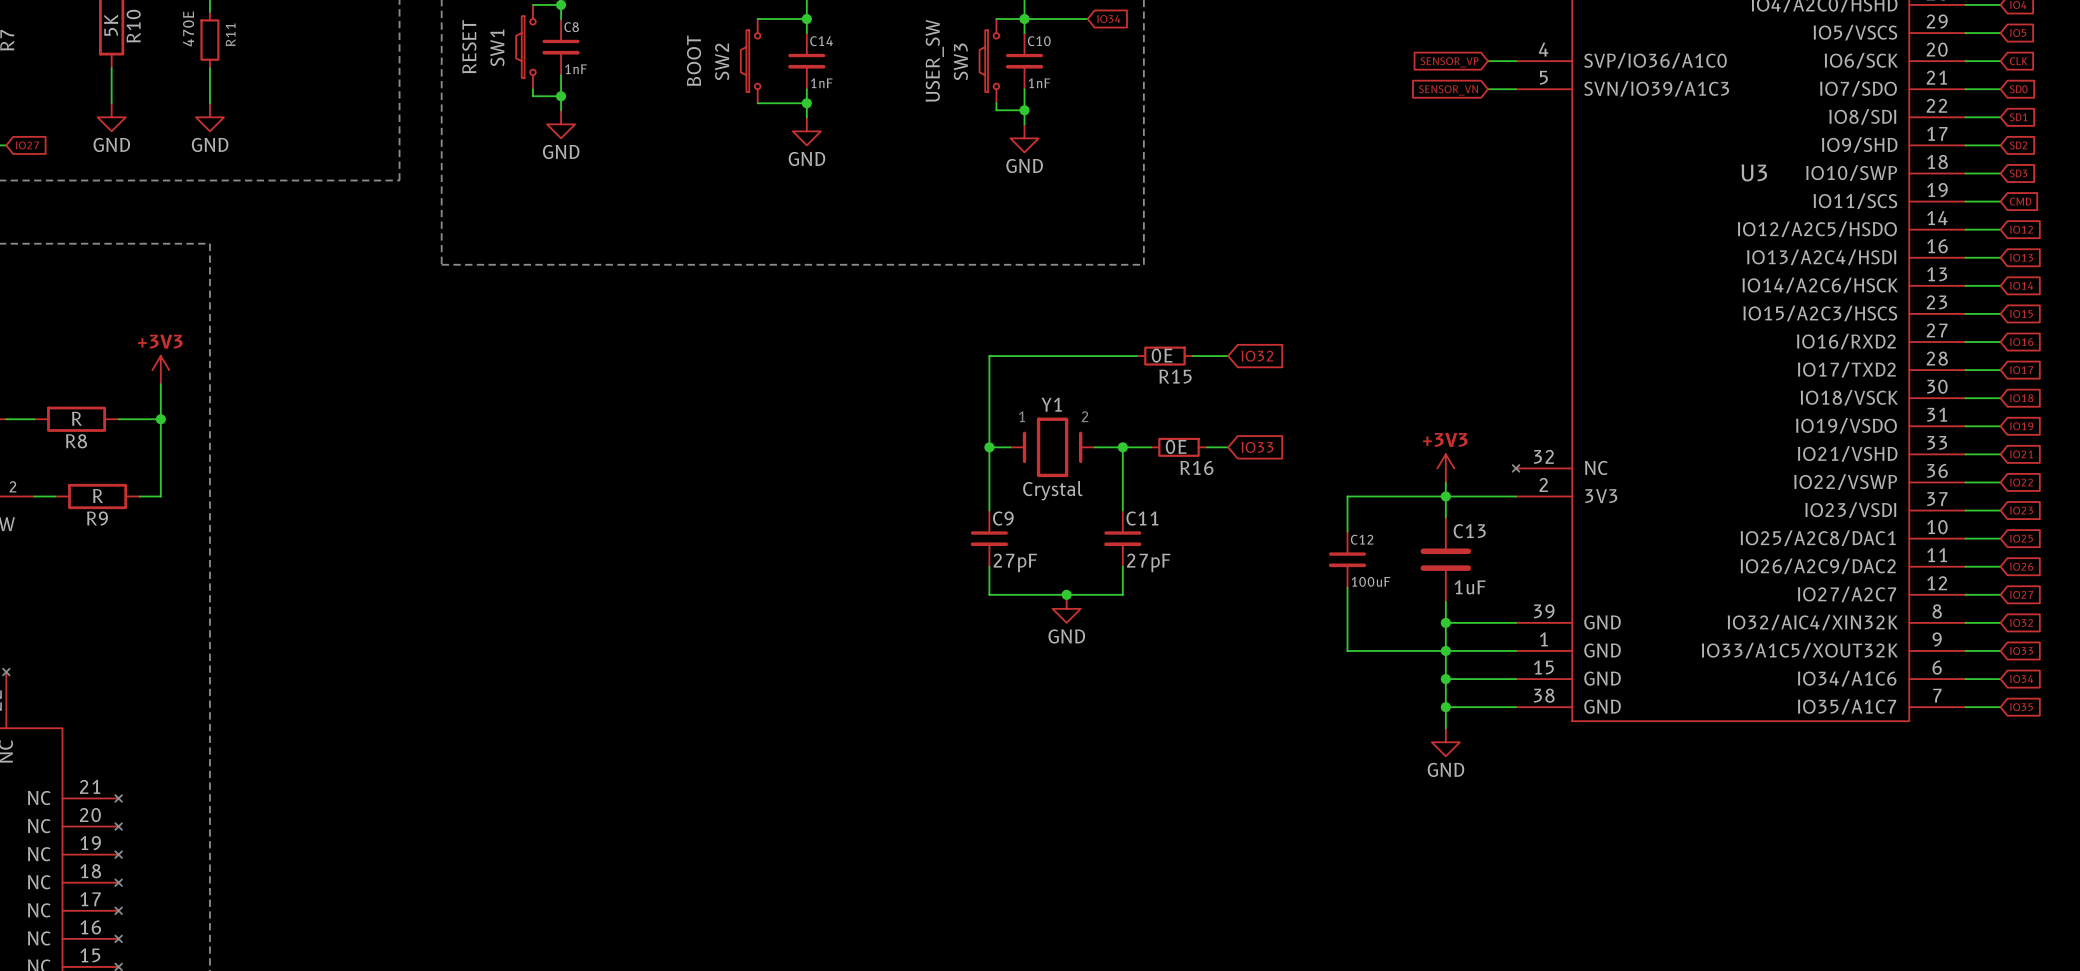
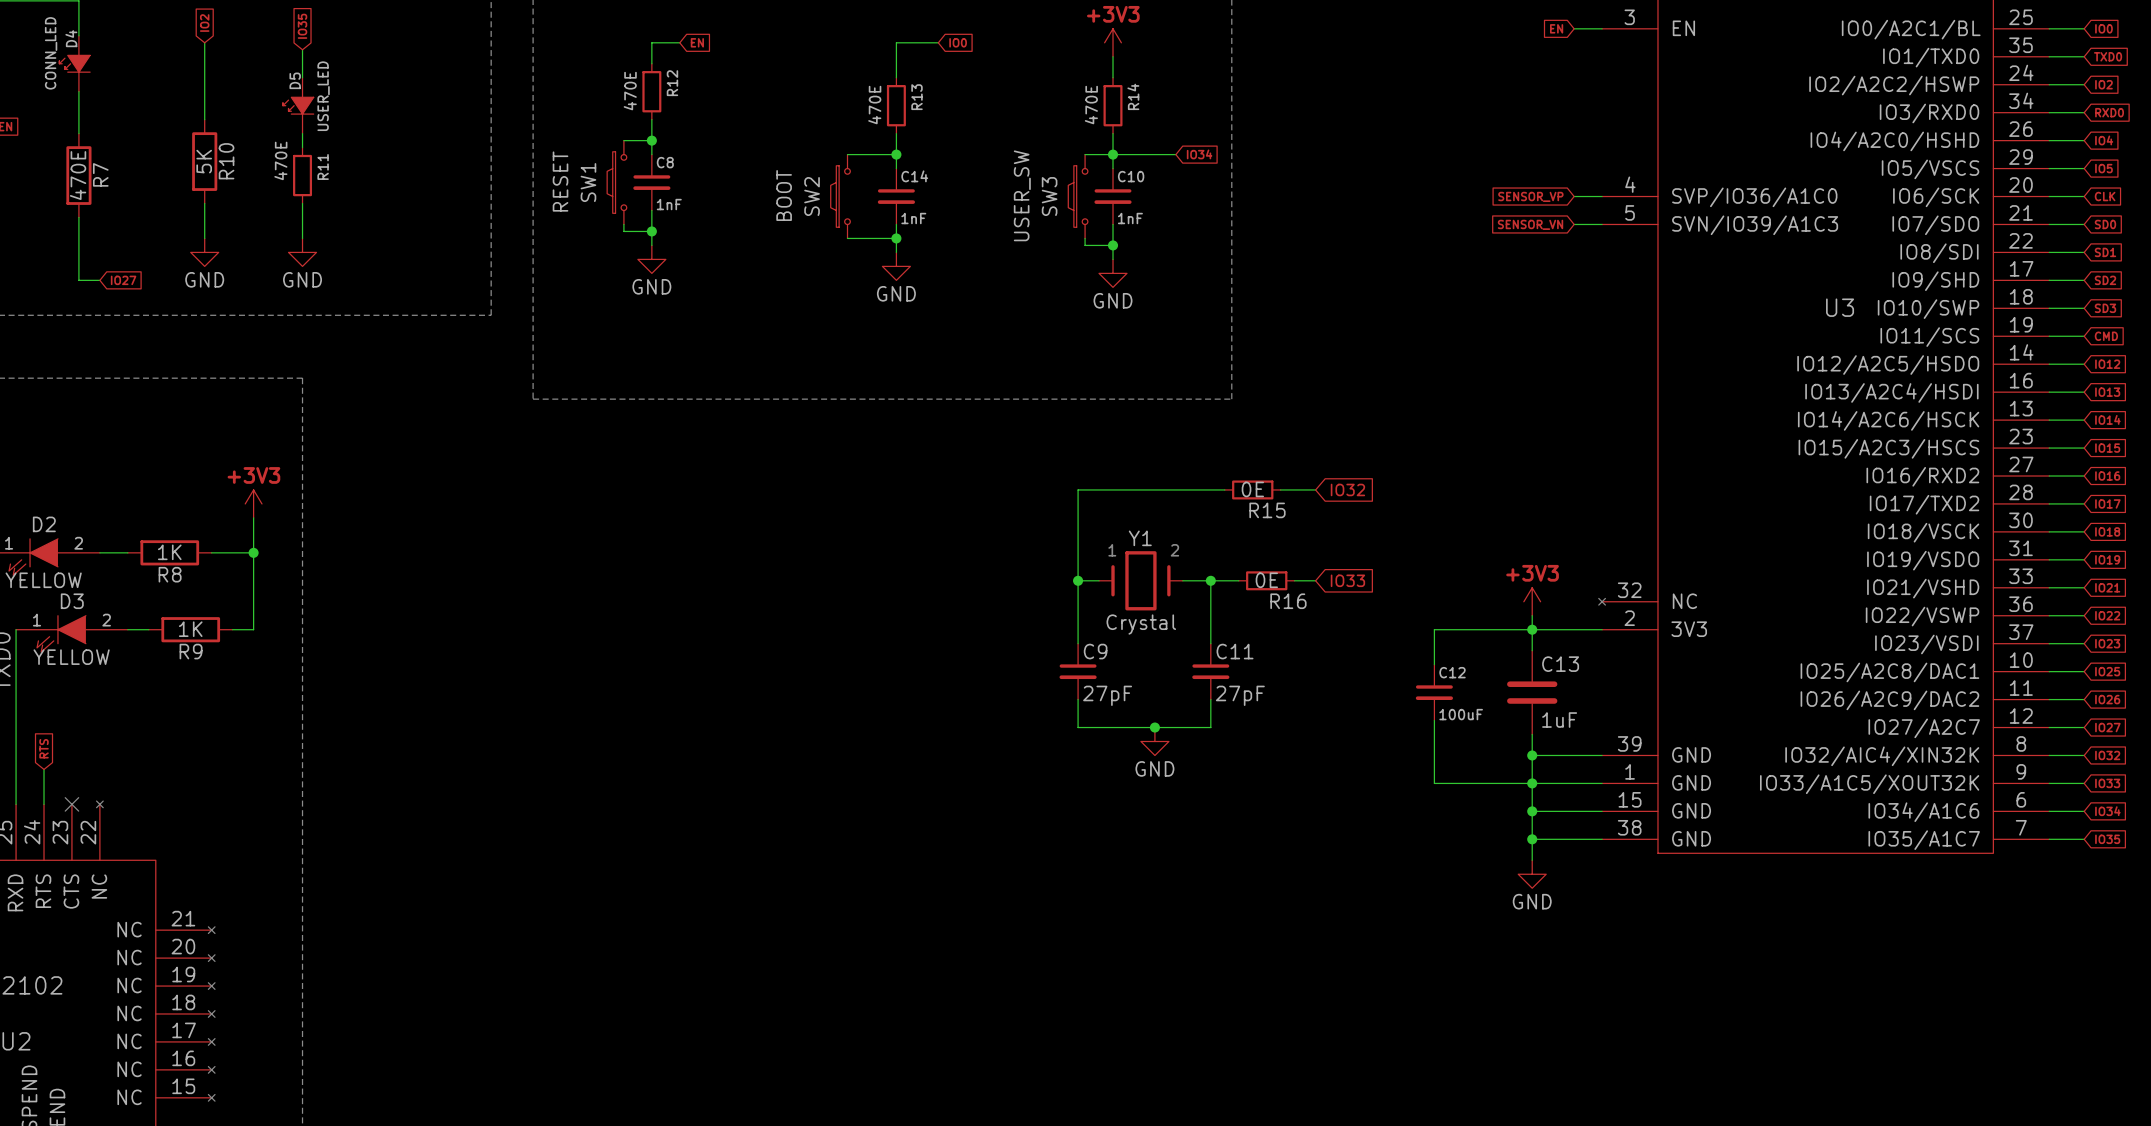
R8 value: R (76, 418) -> 1K (169, 552)
R9 value: R (98, 496) -> 1K (190, 629)

